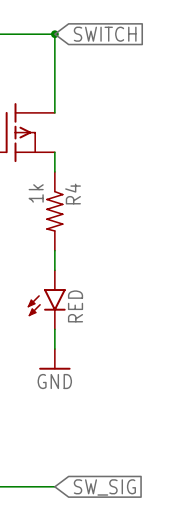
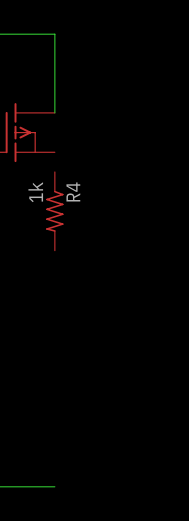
junction: (54, 34) -> none
global label: SWITCH (105, 34) -> none
wire: (54, 152) (54, 171) -> none
wire: (54, 250) (54, 270) -> none
RED: (46, 299) -> none
wire: (54, 329) (54, 349) -> none
power symbol: GND (54, 359) -> none
global label: SW_SIG (104, 487) -> none

